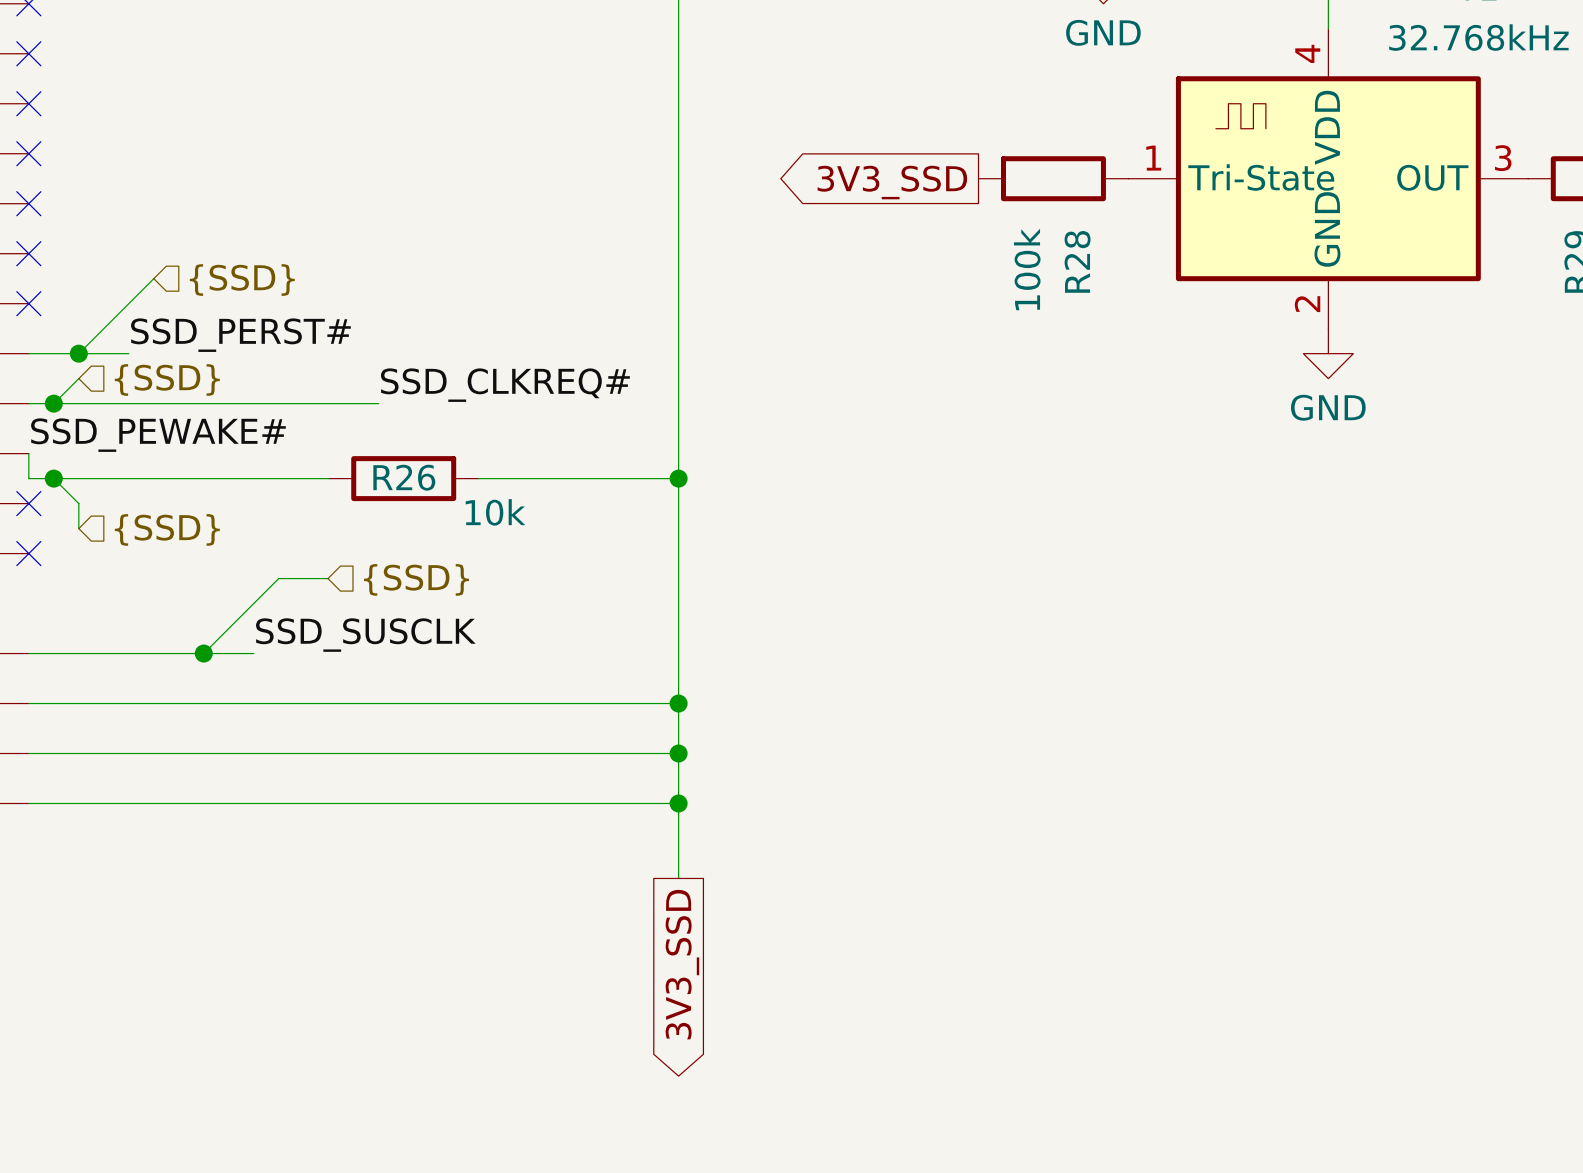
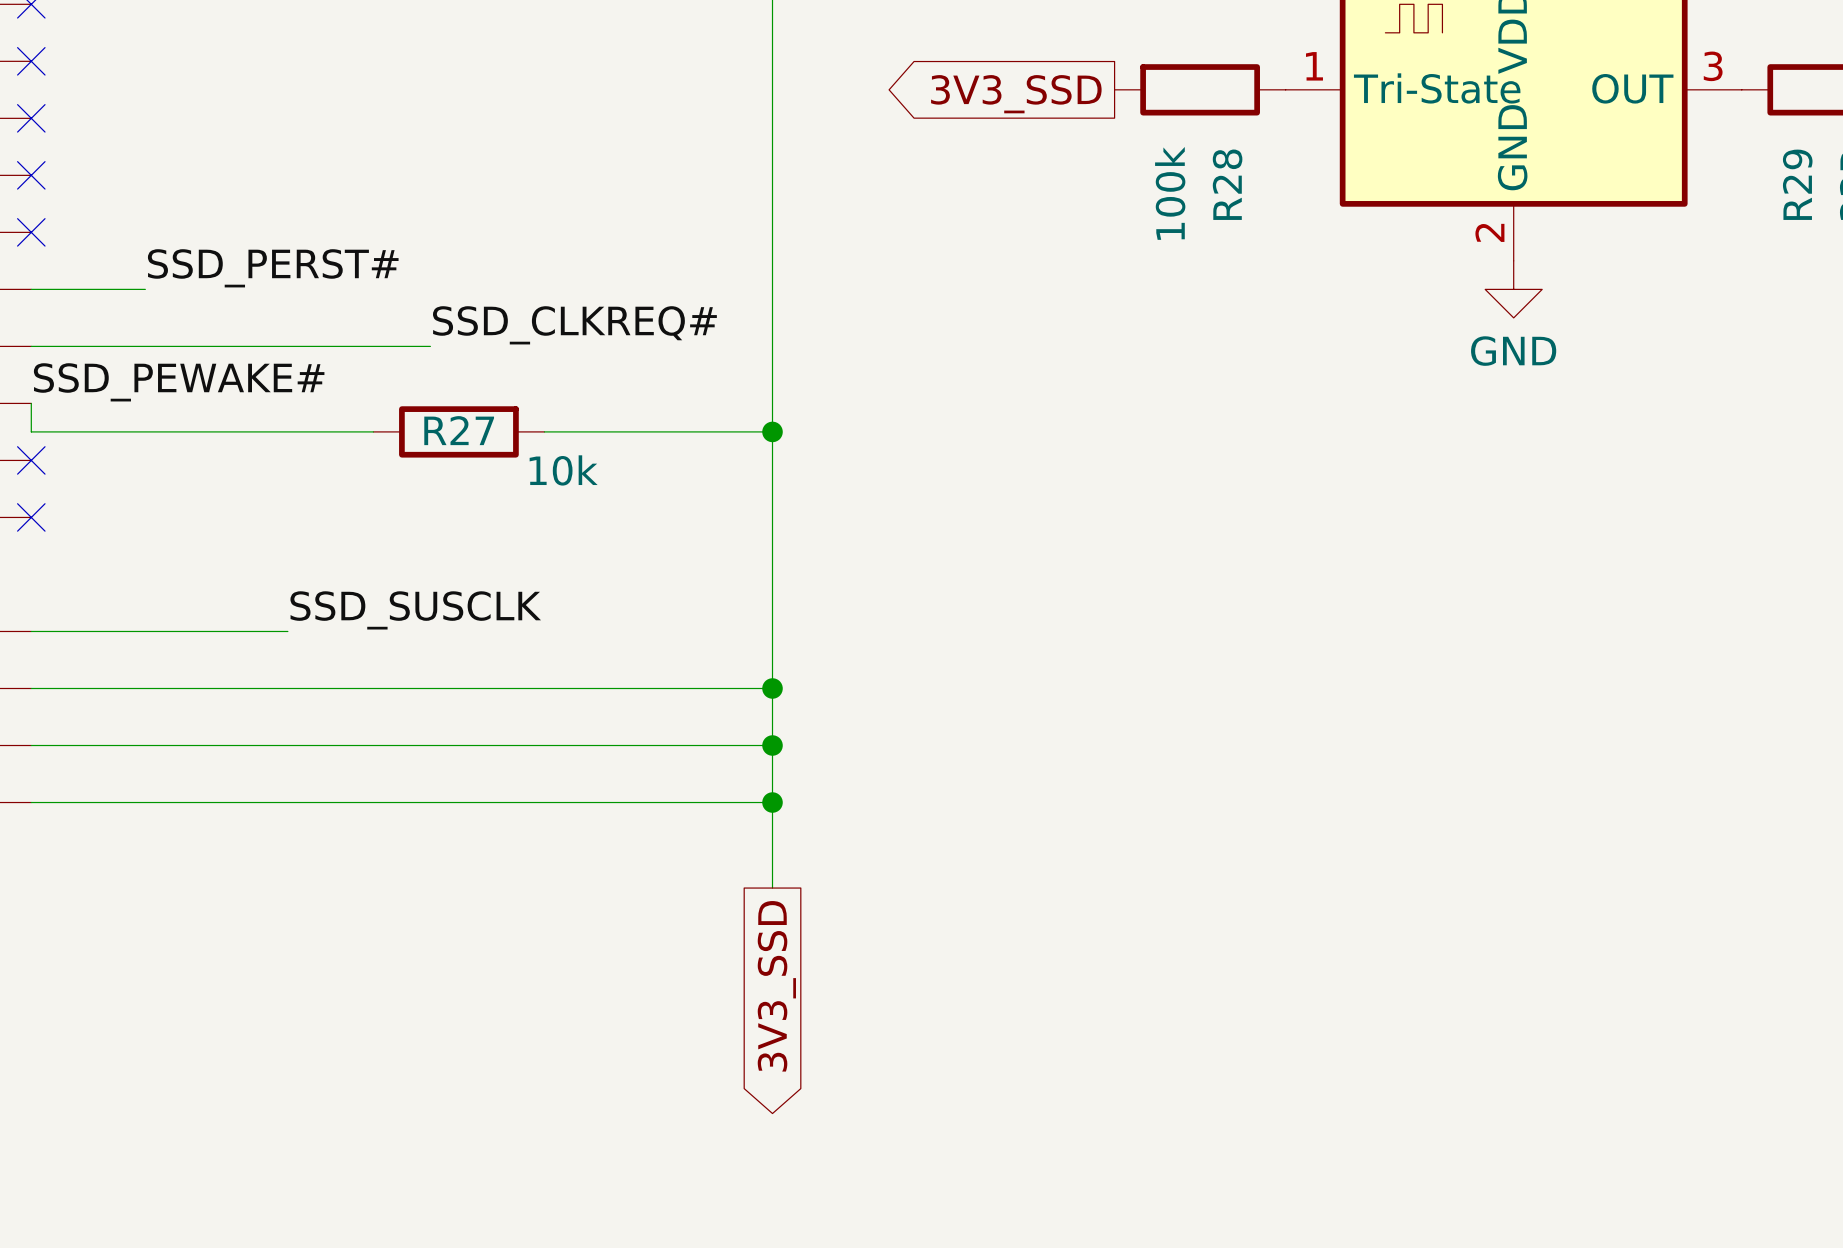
wire: (153, 278) (78, 353) -> none
hierarchical label: {SSD} (242, 280) -> none
junction: (78, 353) -> none
wire: (78, 378) (53, 403) -> none
hierarchical label: {SSD} (167, 379) -> none
junction: (53, 403) -> none
R26 name: R26 (404, 477) -> R27 (459, 430)
wire: (53, 478) (78, 503) (78, 528) -> none
junction: (53, 478) -> none
hierarchical label: {SSD} (167, 529) -> none
wire: (328, 578) (278, 578) (203, 653) -> none
hierarchical label: {SSD} (416, 579) -> none
junction: (203, 653) -> none

